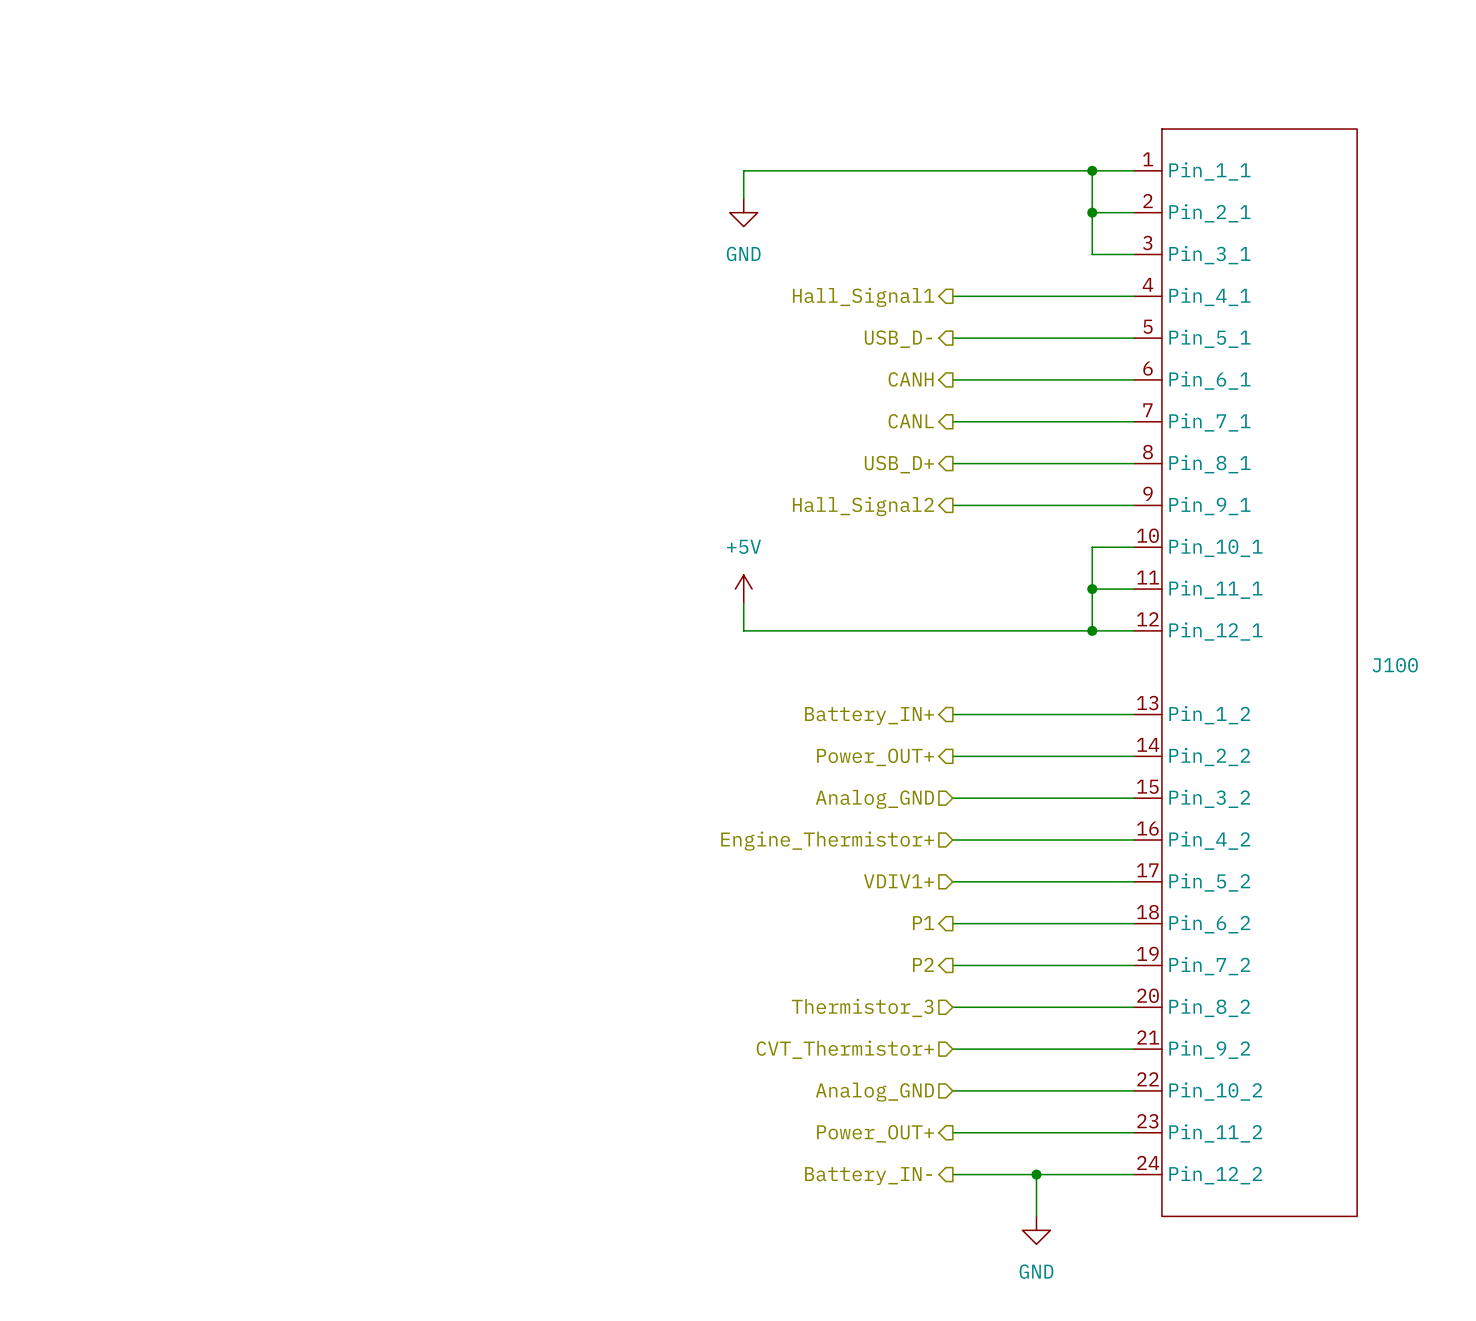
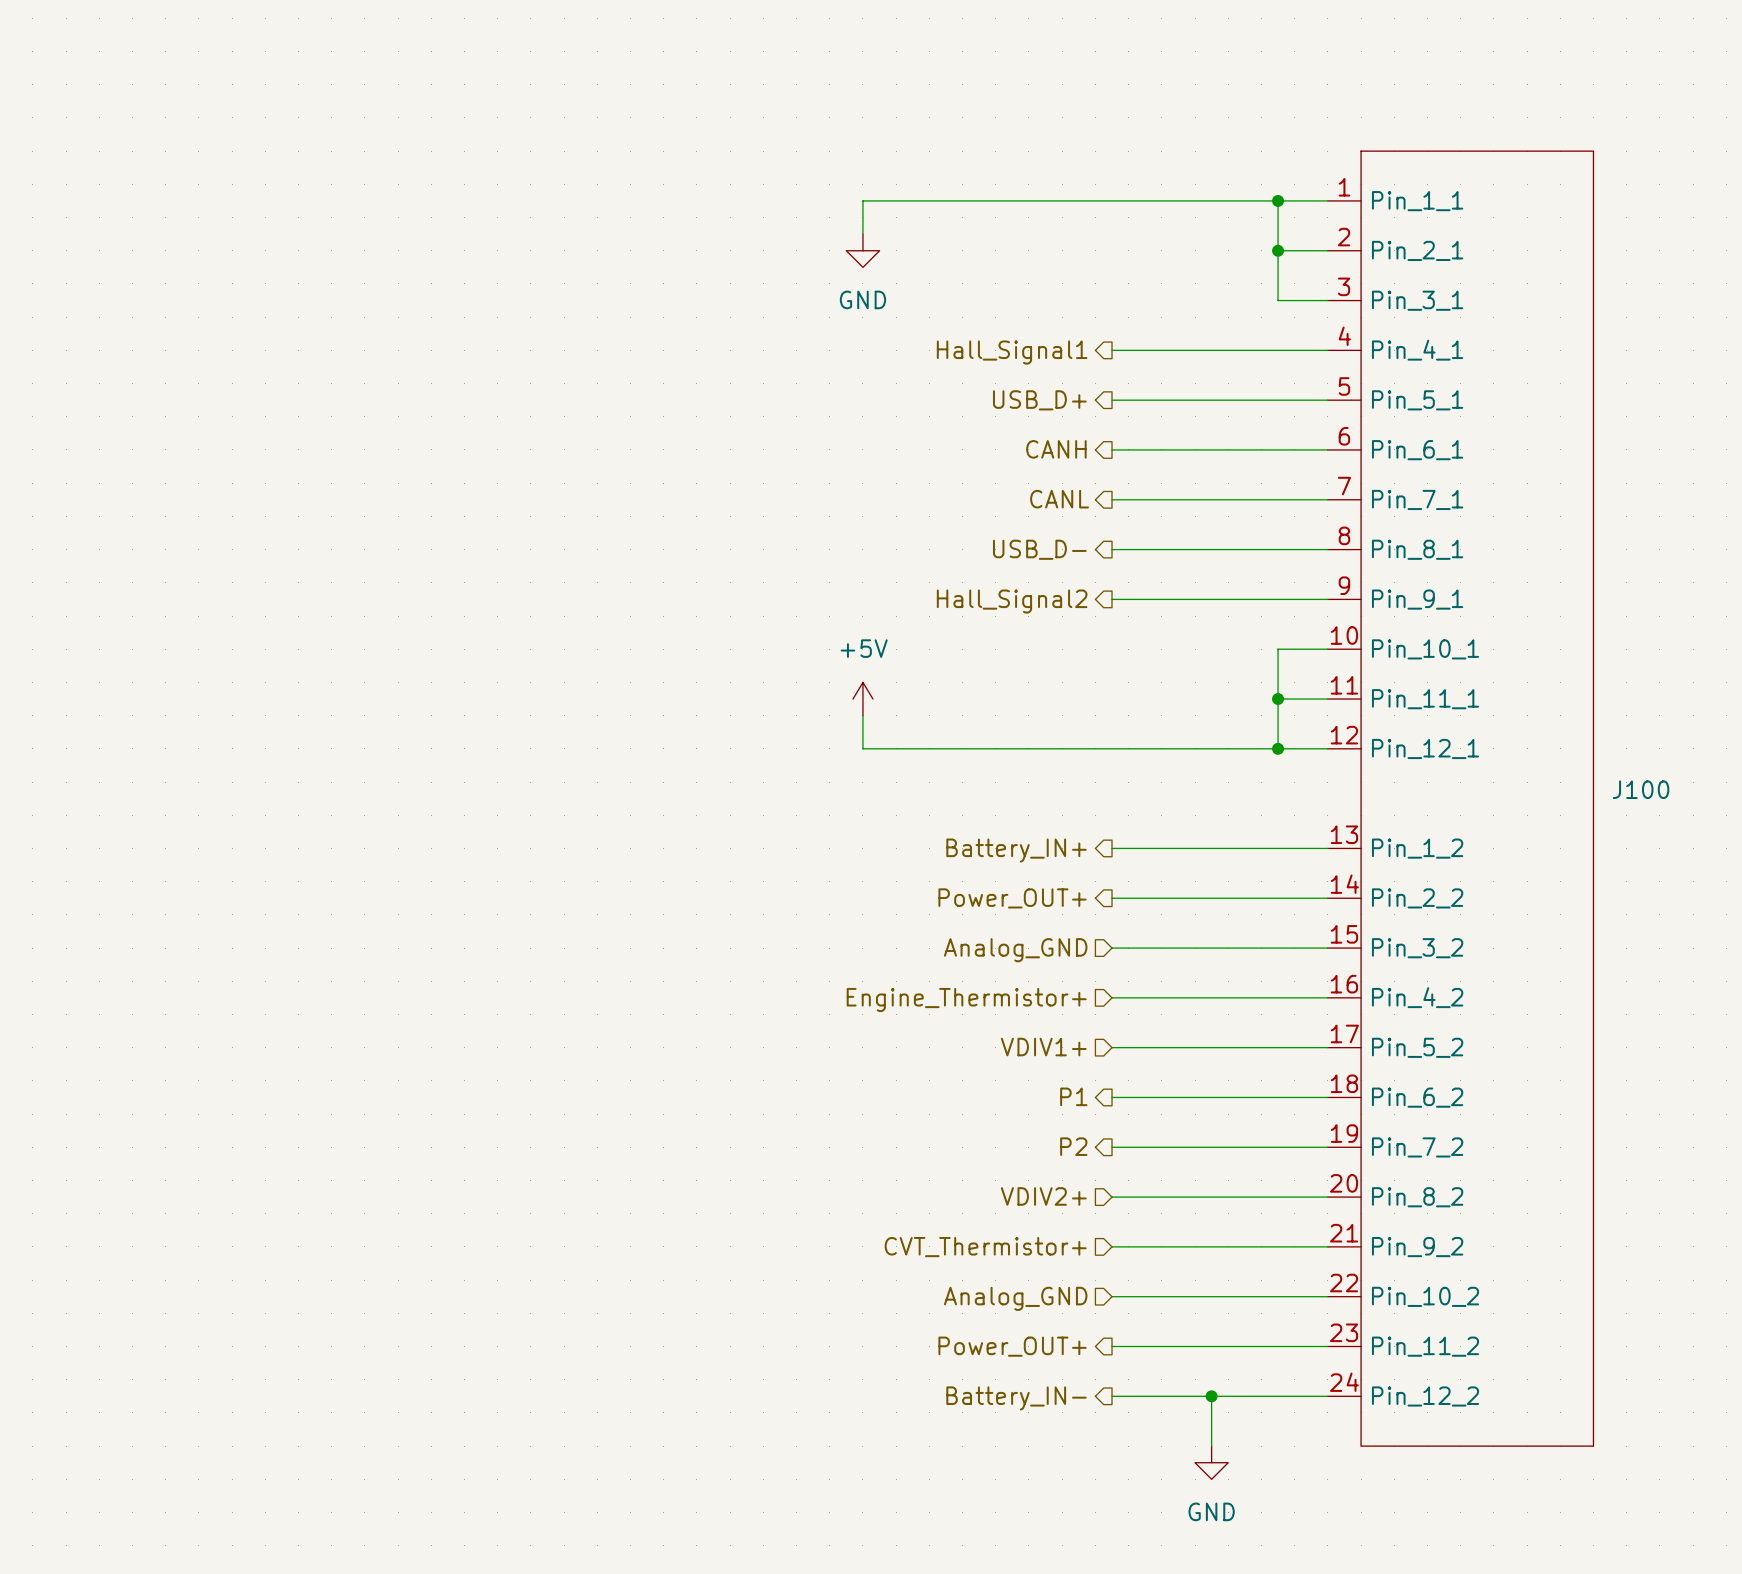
hierarchical label: USB_D- (898, 339) -> USB_D+ (1039, 400)
hierarchical label: USB_D+ (899, 464) -> USB_D- (1039, 549)
hierarchical label: Thermistor_3 (862, 1007) -> VDIV2+ (1043, 1196)

